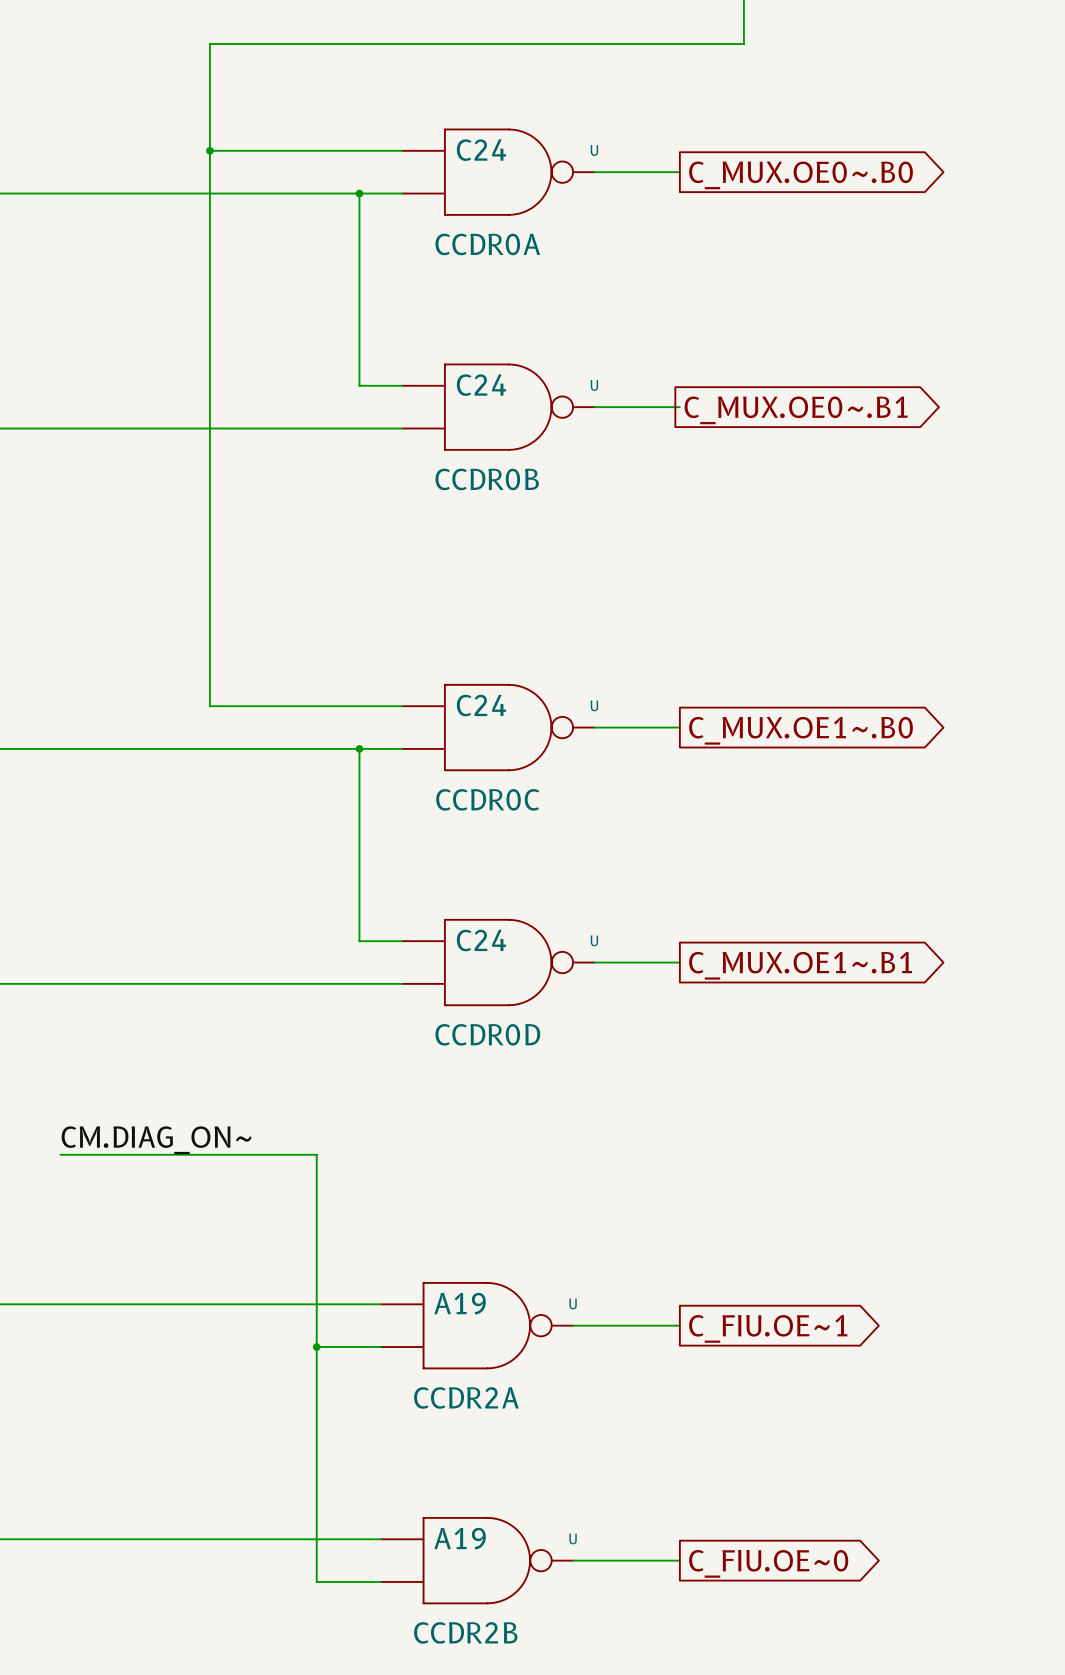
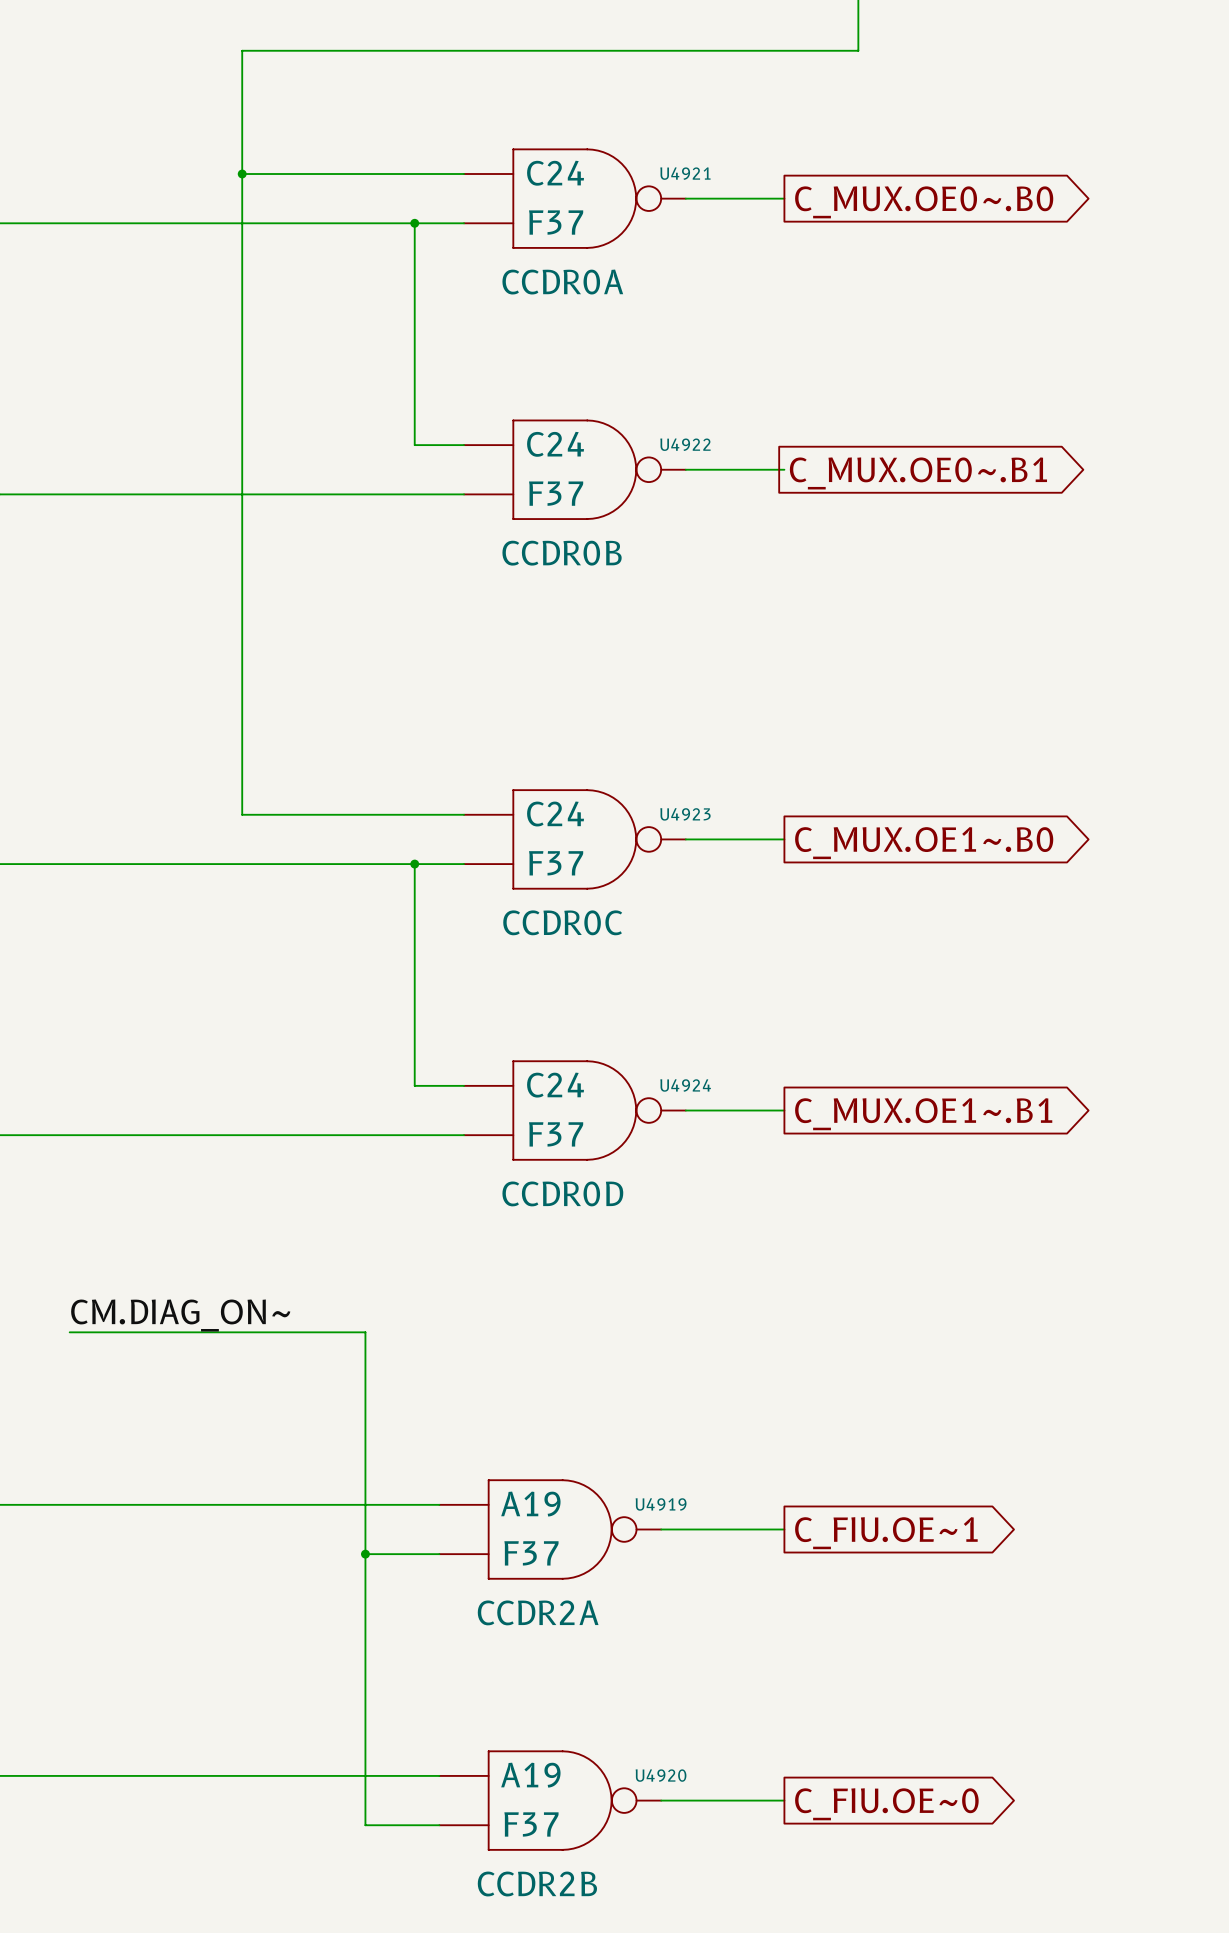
U name: U (594, 150) -> U4921 (685, 173)
U value: none -> F37 (556, 222)
U name: U (594, 385) -> U4922 (685, 444)
U value: none -> F37 (556, 493)
U name: U (594, 705) -> U4923 (685, 814)
U value: none -> F37 (556, 863)
U name: U (594, 940) -> U4924 (685, 1085)
U value: none -> F37 (556, 1134)
U name: U (572, 1303) -> U4919 (661, 1504)
U value: none -> F37 (531, 1553)
U name: U (572, 1538) -> U4920 (661, 1775)
U value: none -> F37 (531, 1824)

